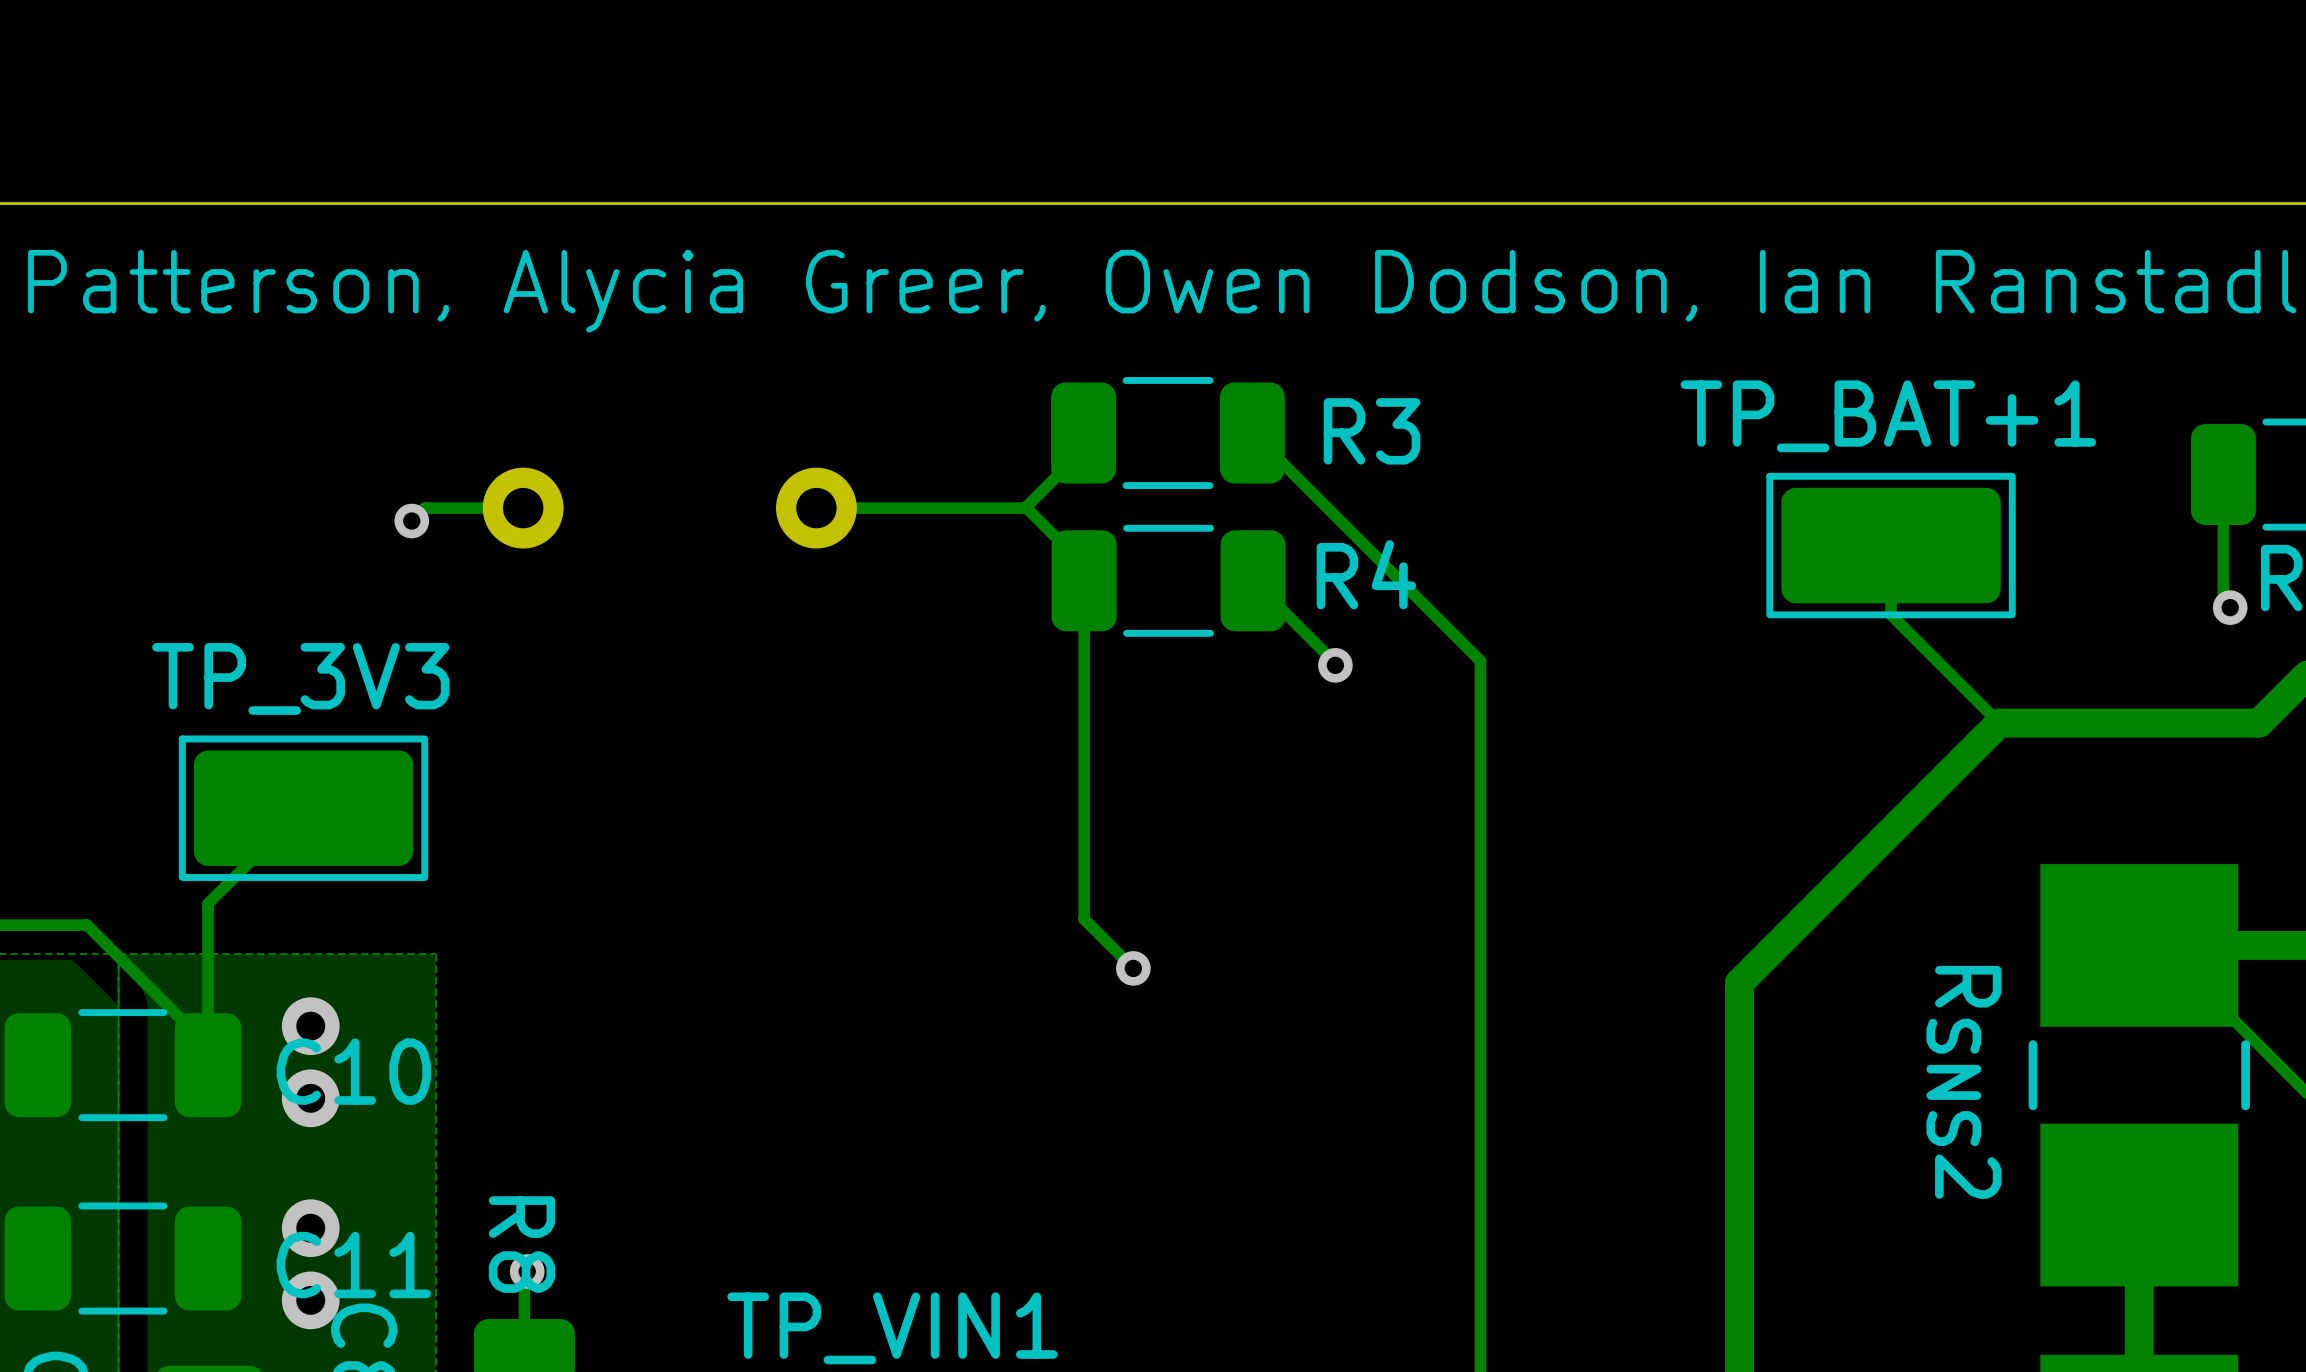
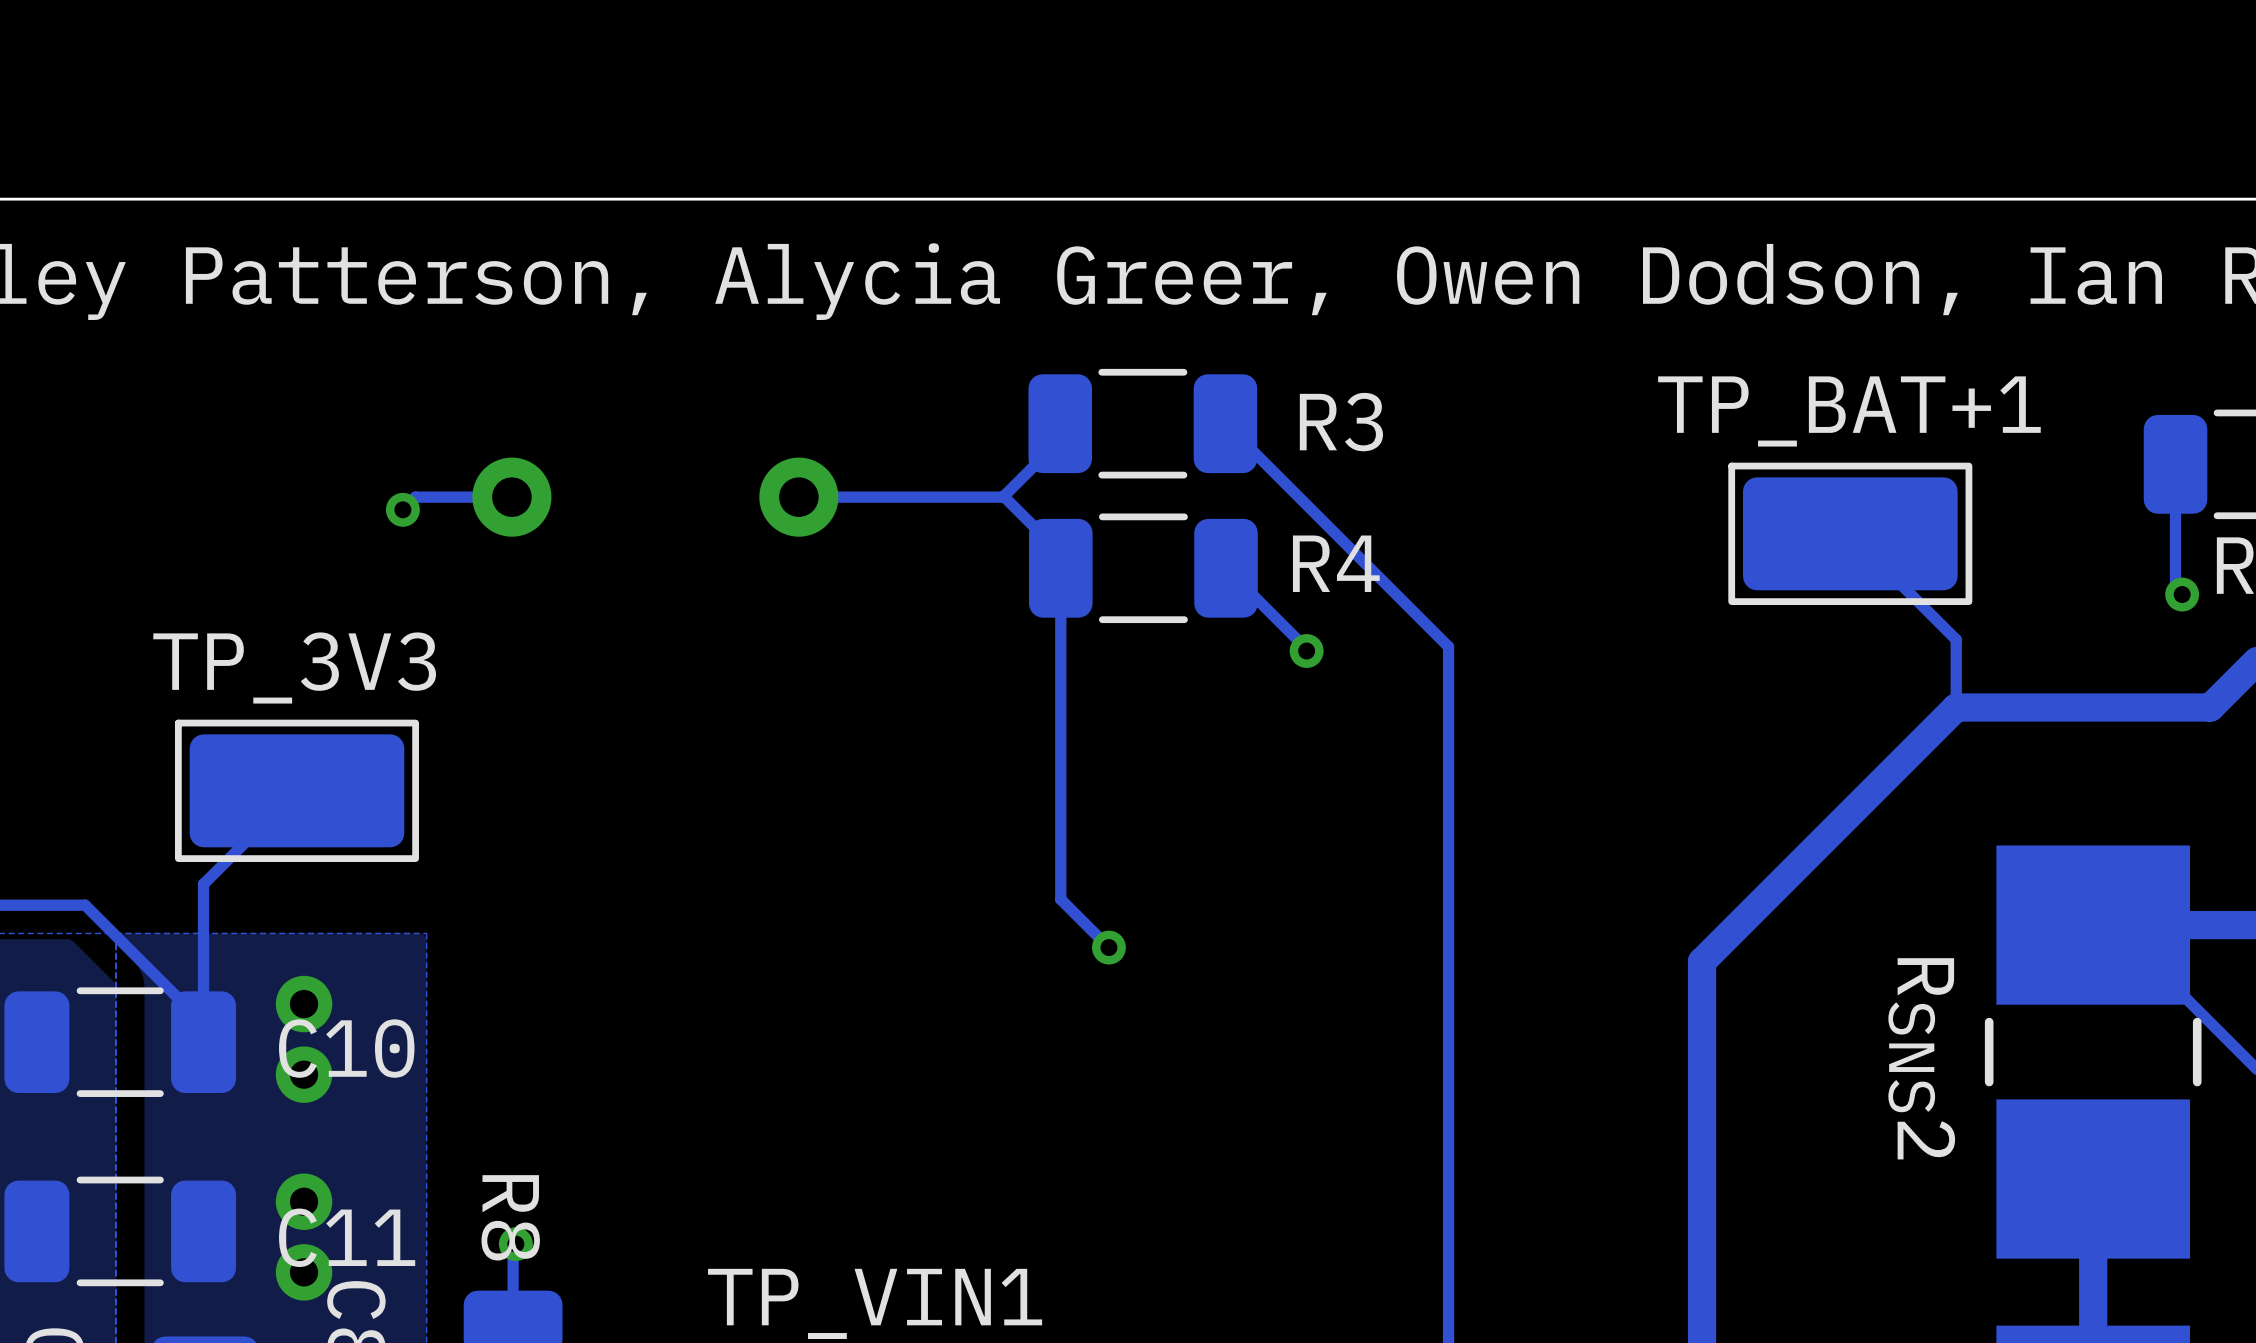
track: (1891, 545) (1891, 614) (1999, 723) -> (1850, 533) (1956, 639) (1956, 707)

